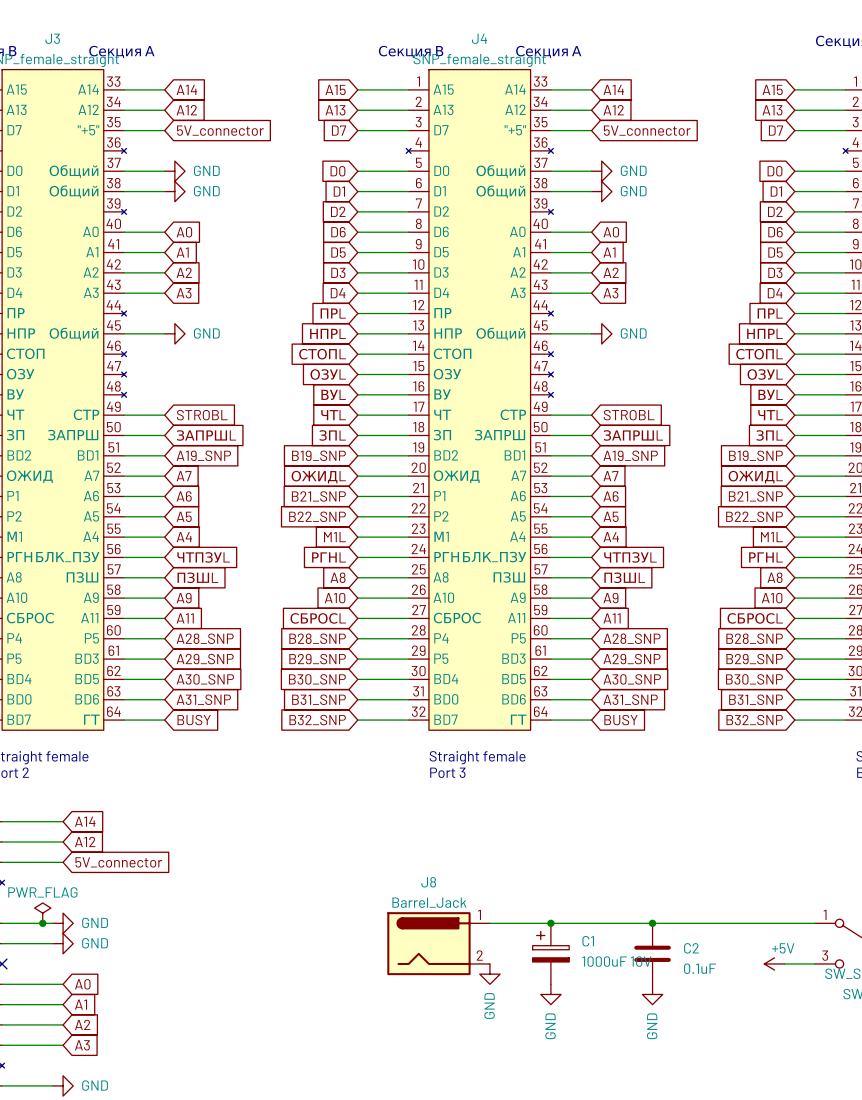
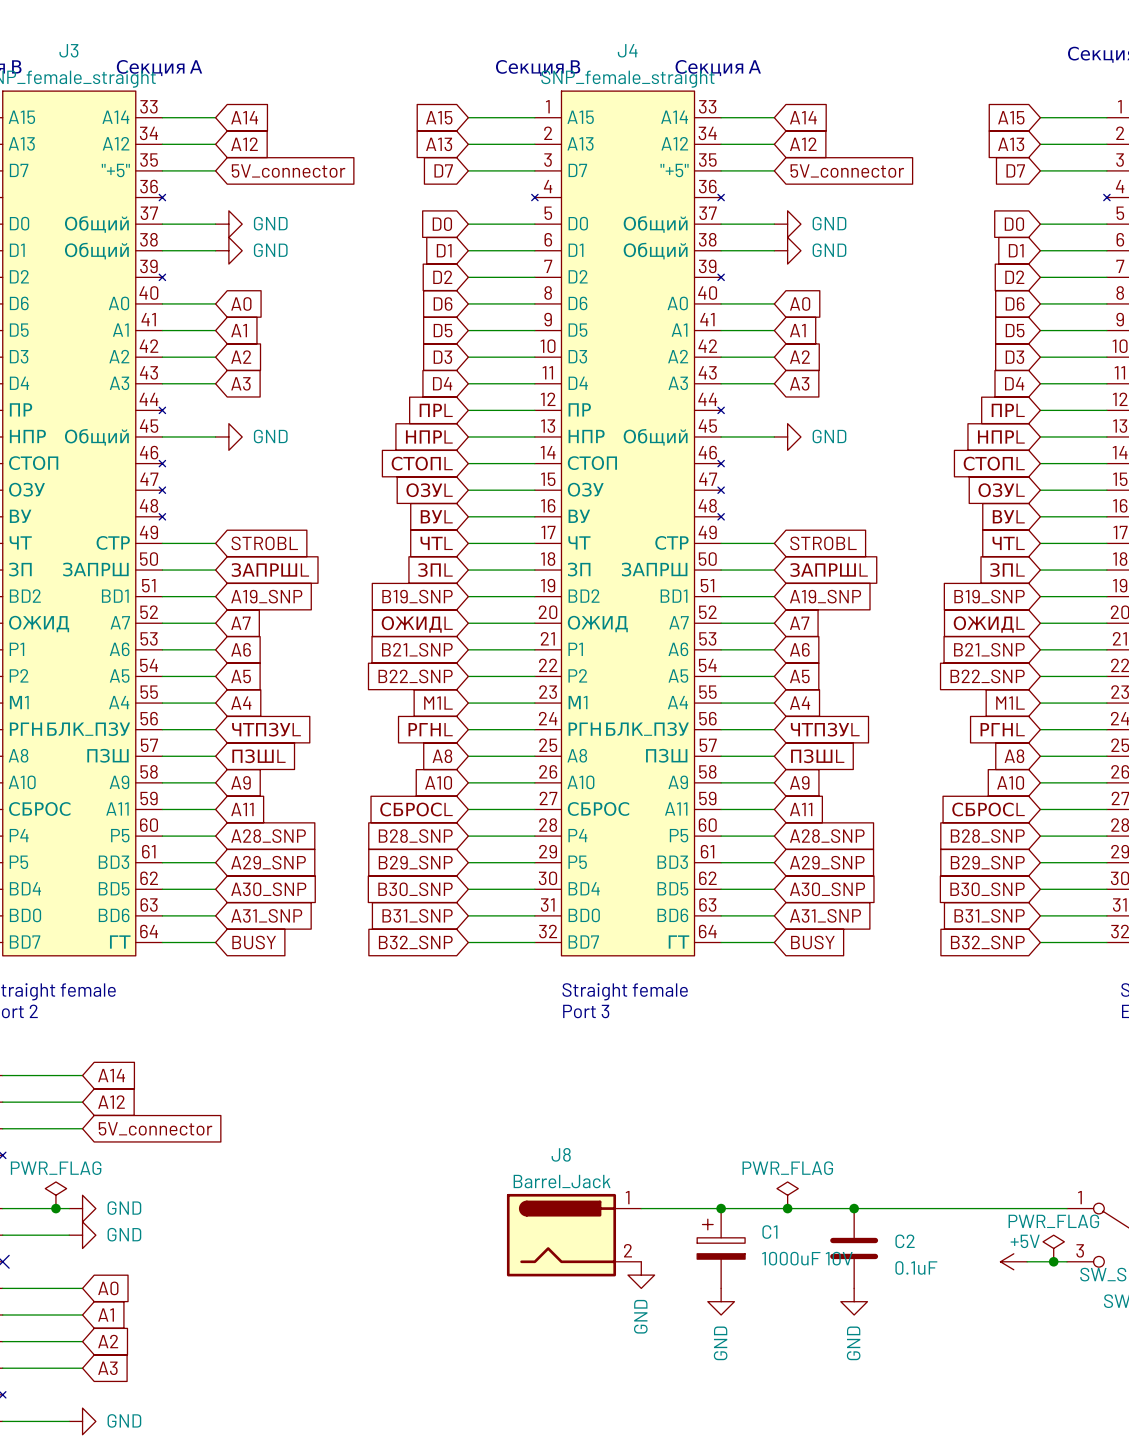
power symbol: none -> PWR_FLAG (787, 1195)
junction: none -> (787, 1208)
power symbol: none -> PWR_FLAG (1053, 1248)
junction: none -> (1053, 1261)

